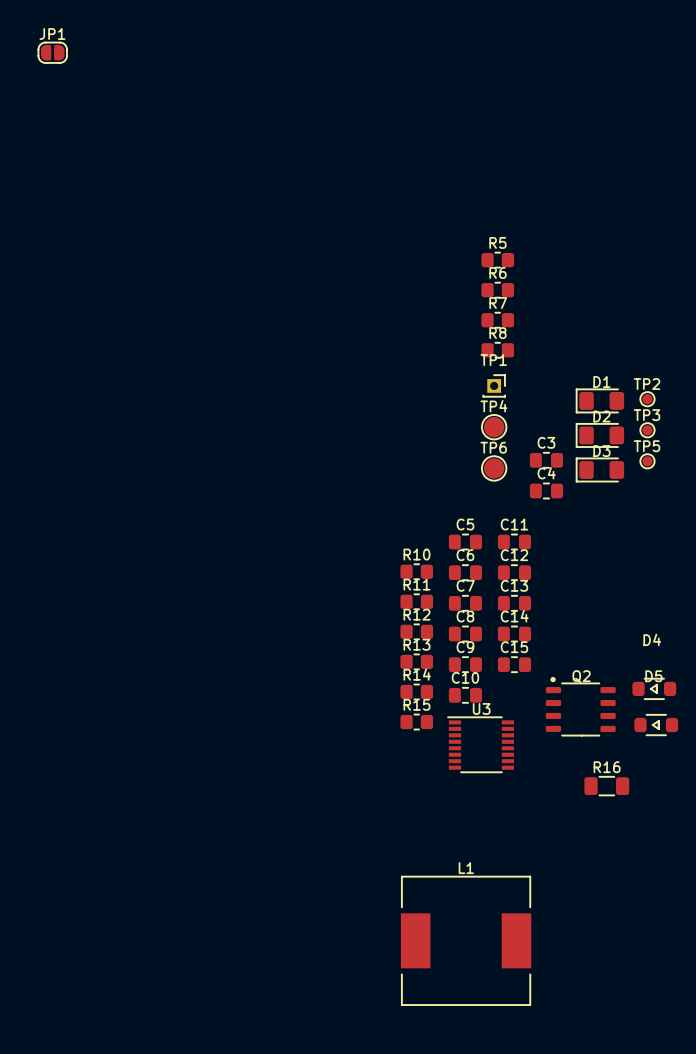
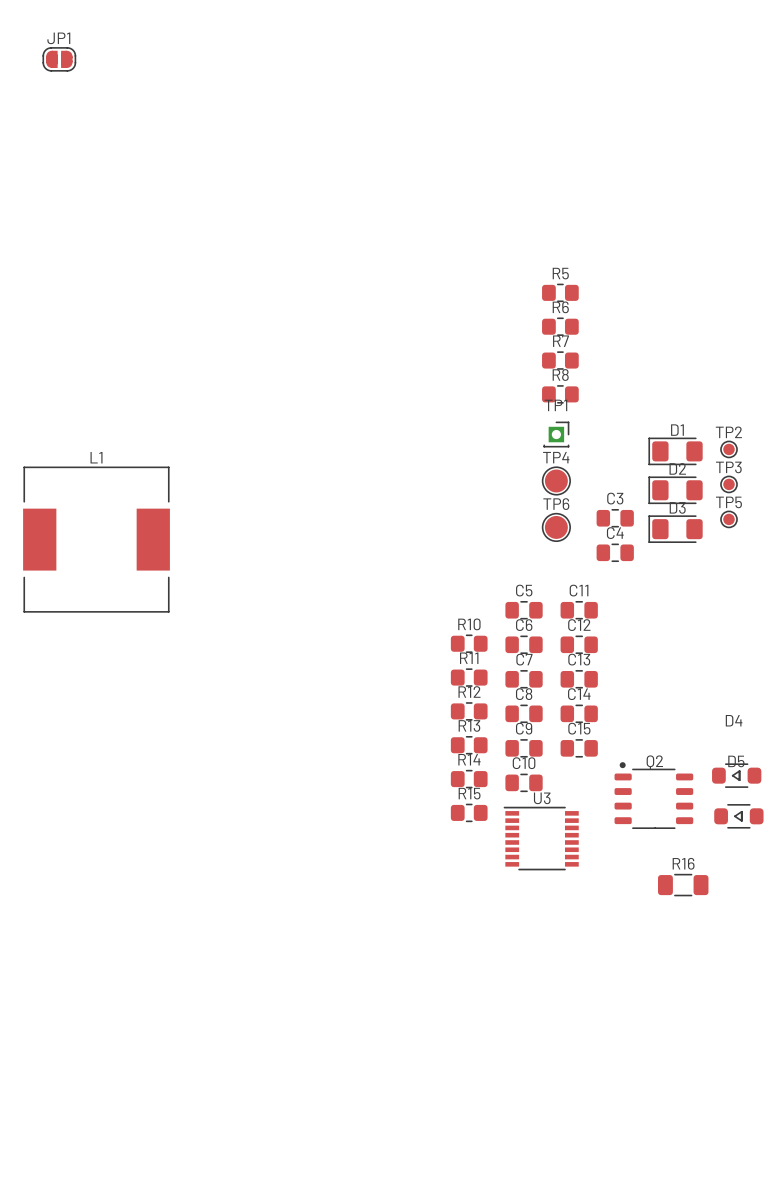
L1 position: (466, 940) -> (96, 539)

